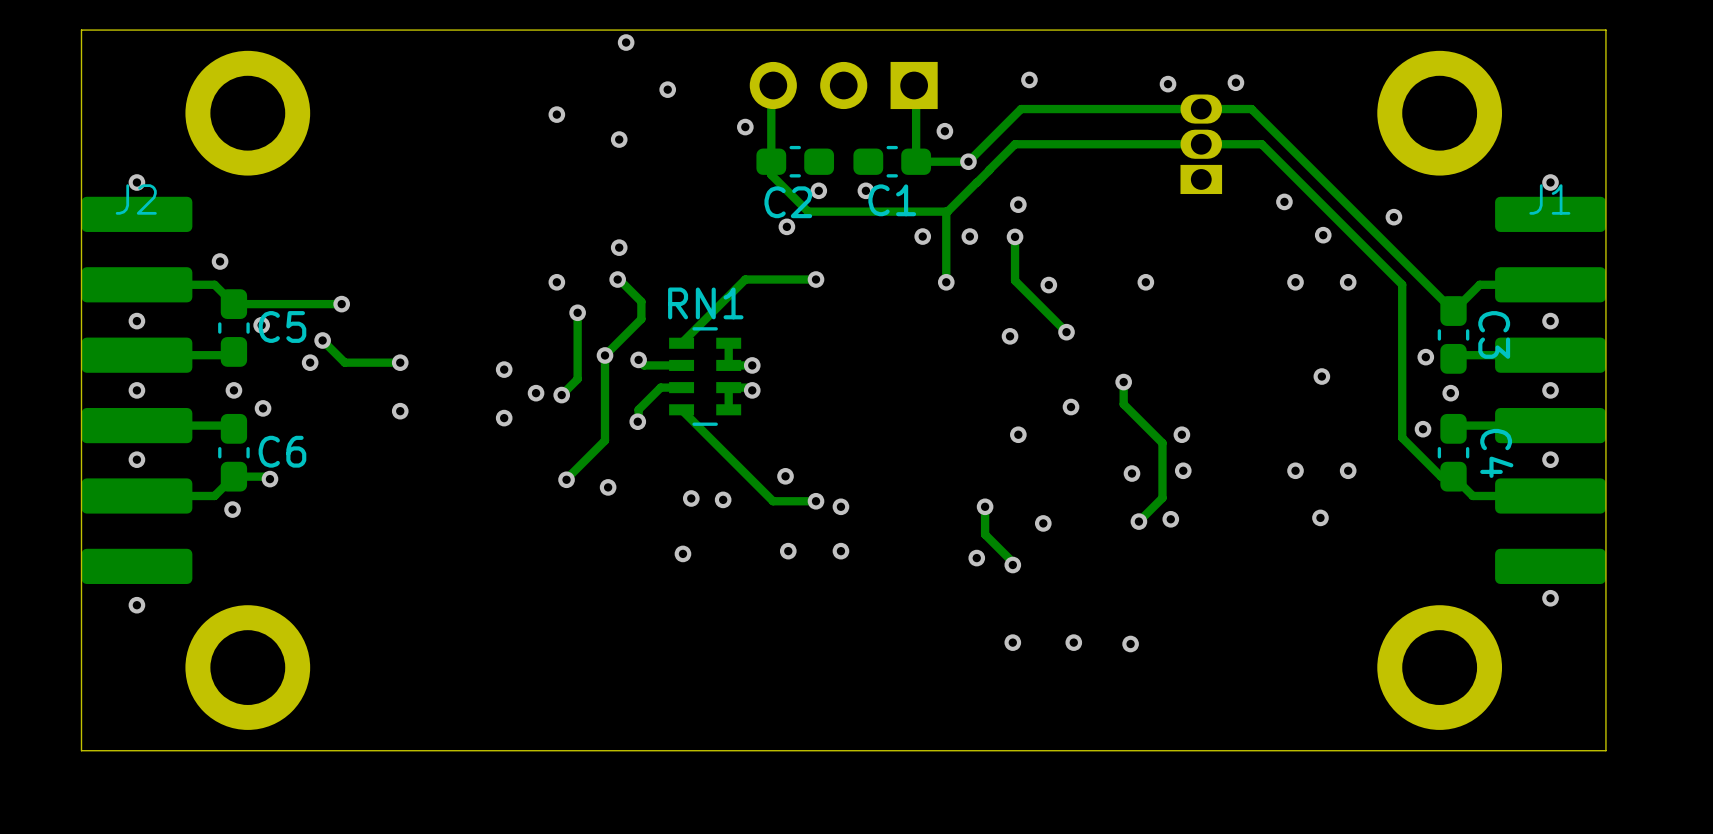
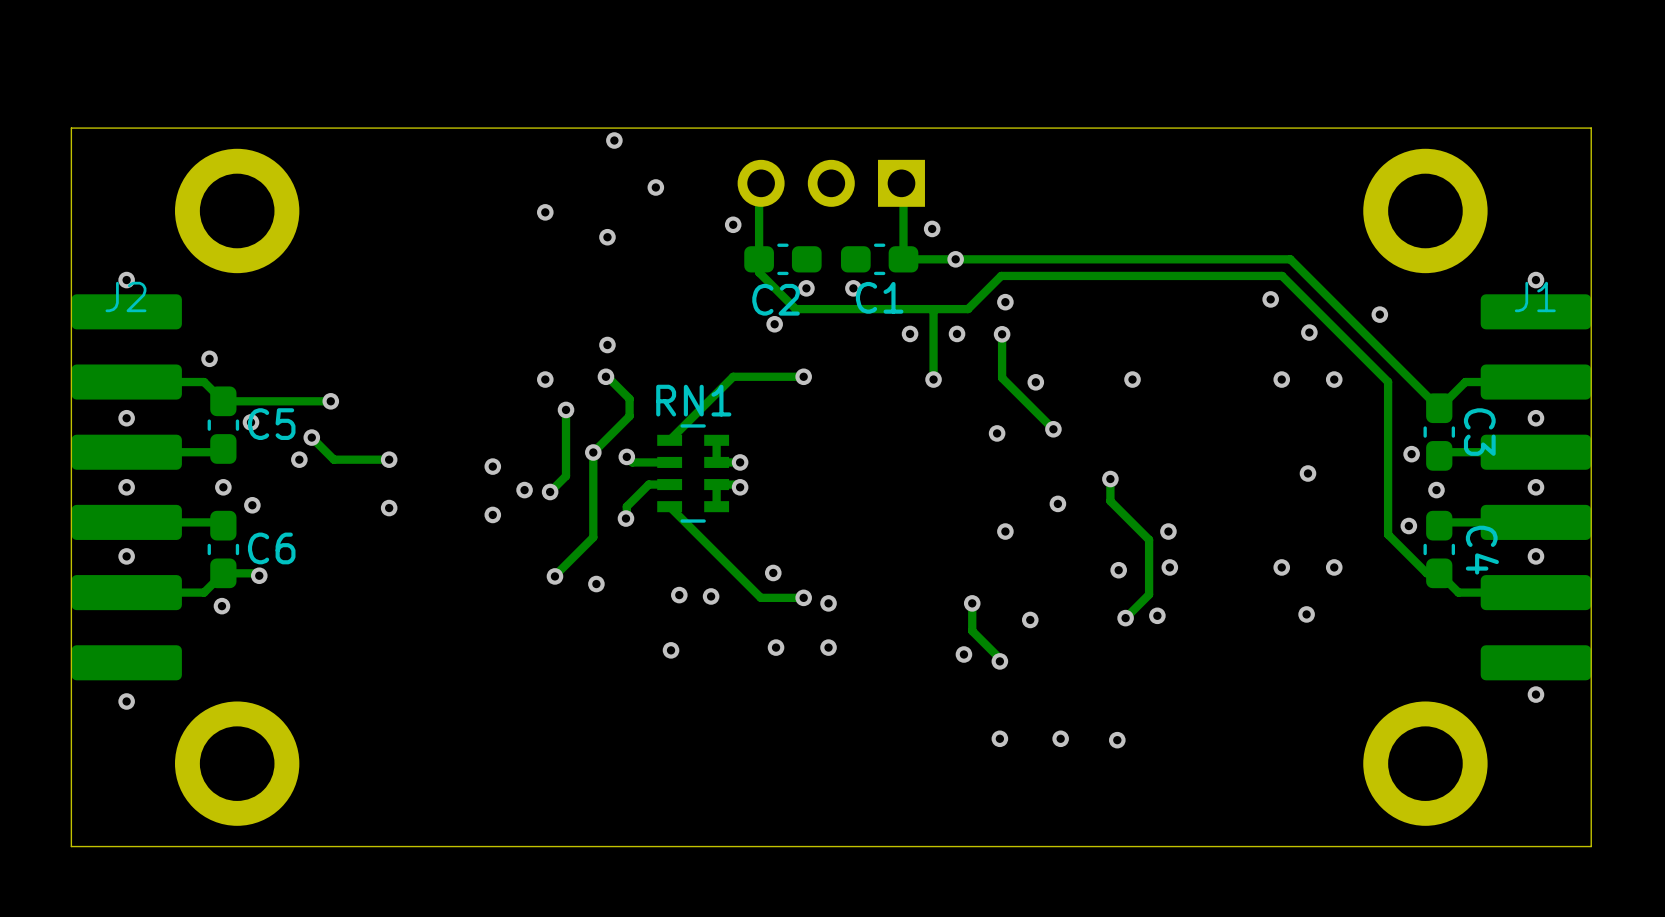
via: (1029, 79) -> none
via: (1235, 82) -> none
via: (1168, 84) -> none
part: (1201, 144) -> none
track: (1304, 161) (1251, 109) (1021, 109) (968, 161) -> (1290, 259) (955, 259)
track: (989, 170) (1015, 144) (1261, 144) (1295, 178) -> (934, 309) (968, 309) (1001, 275) (1282, 275)
track: (989, 170) (977, 182) -> none
track: (976, 182) (947, 211) -> none

